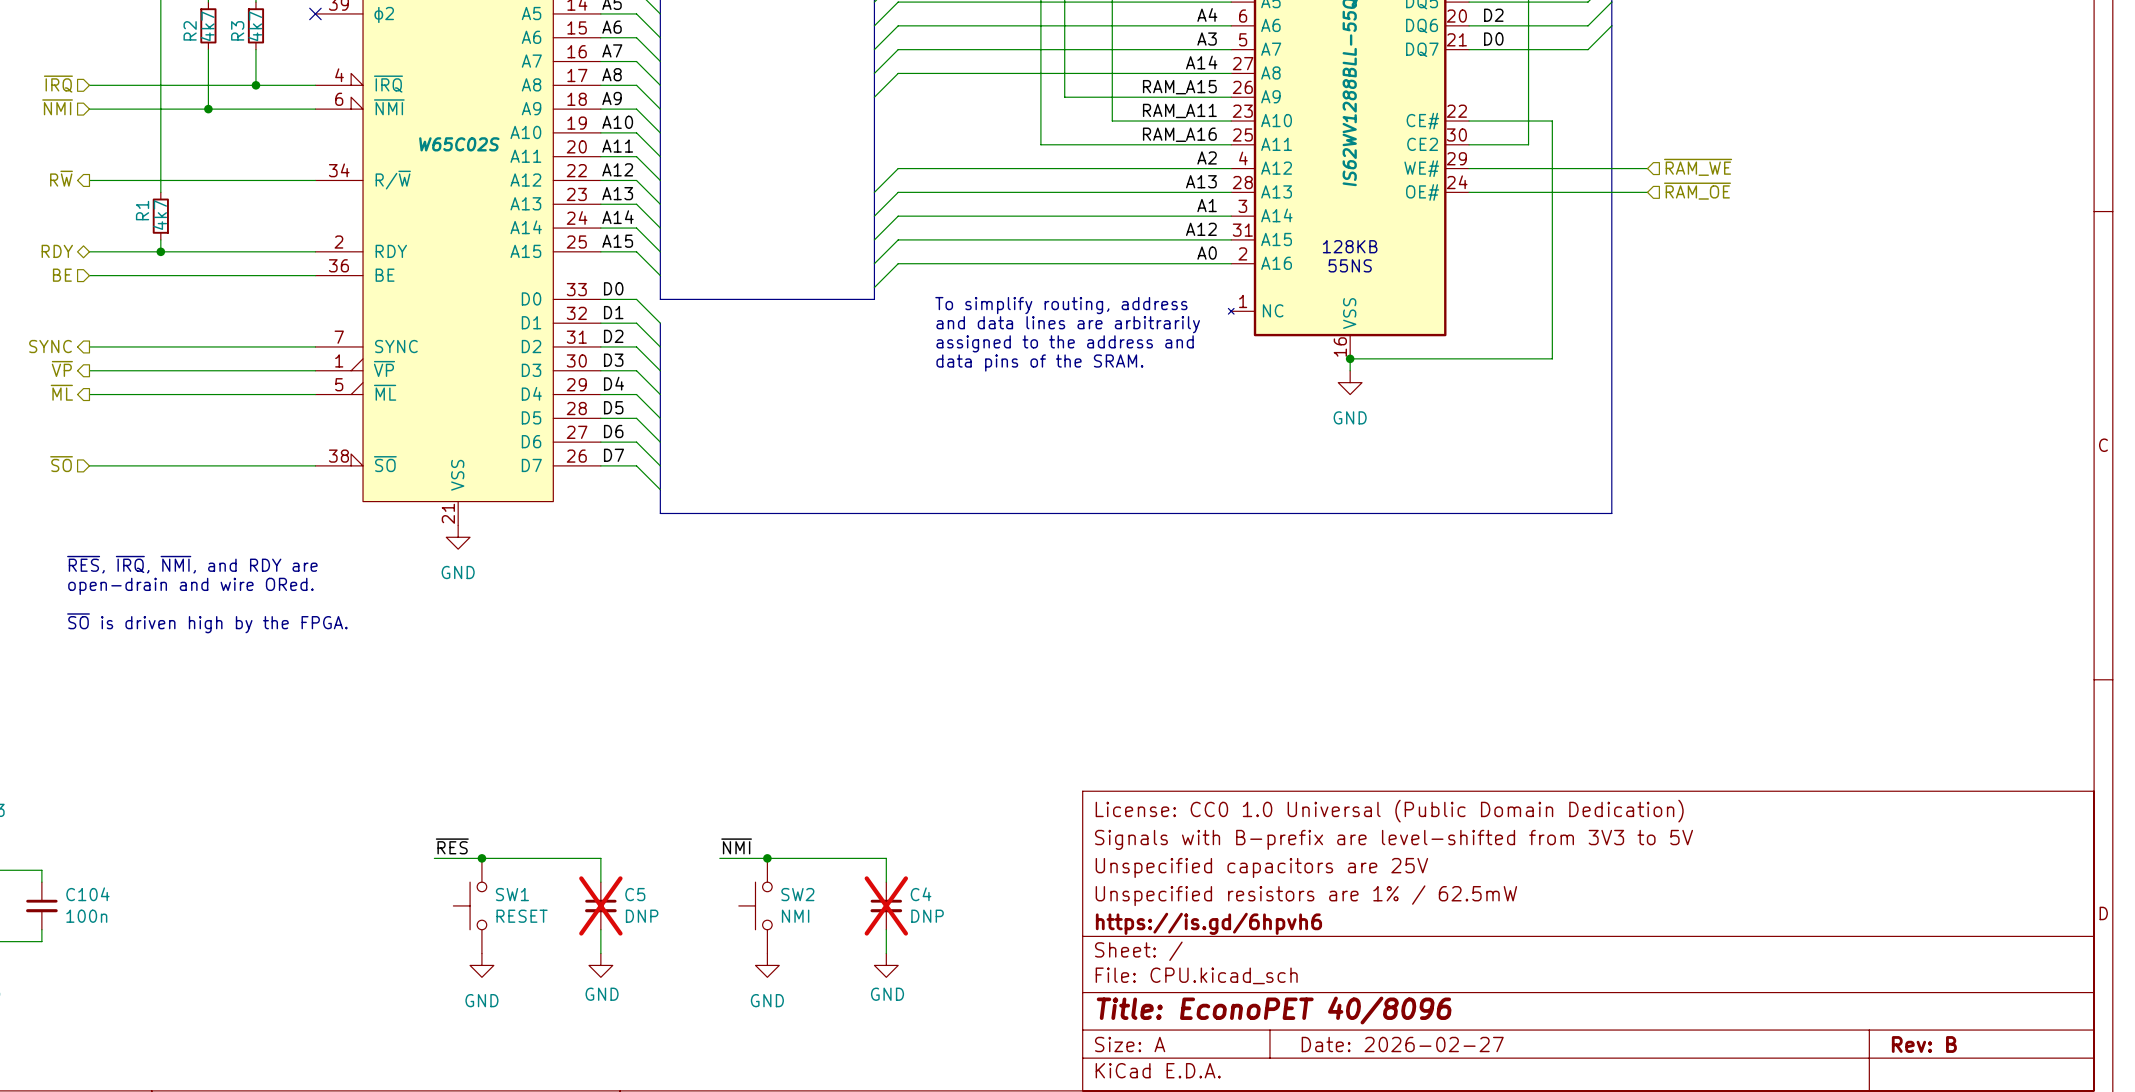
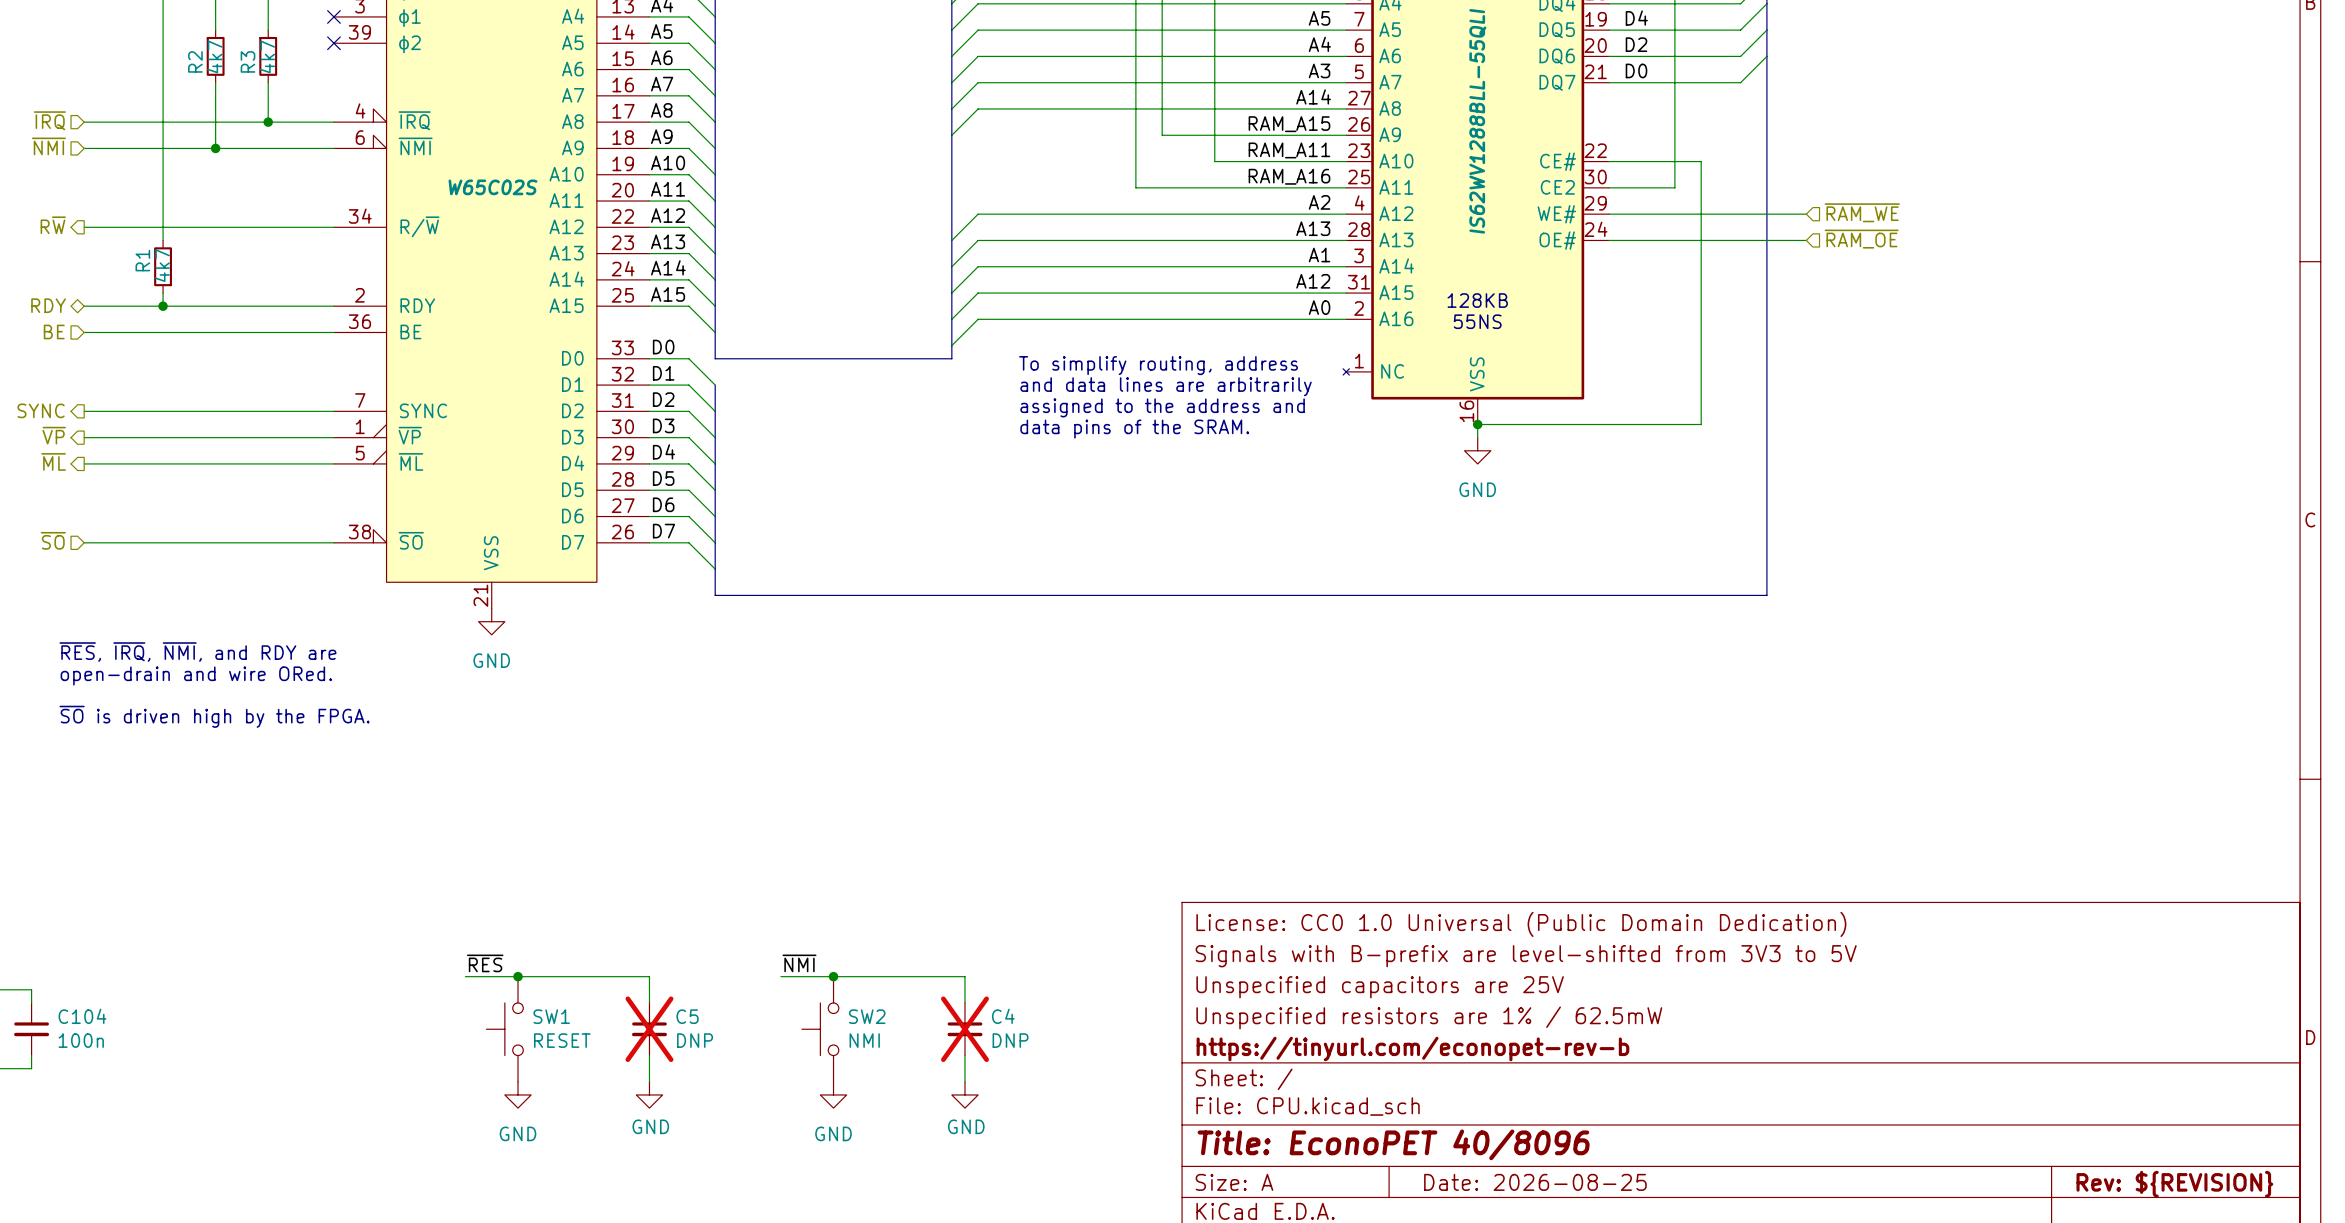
title block: https://is.gd/6hpvh6 (1208, 923) -> https://tinyurl.com/econopet-rev-b (1412, 1049)
title block: Date: 2026-02-27 (1402, 1044) -> Date: 2026-08-25 (1535, 1182)
title block: Rev: B (1924, 1044) -> Rev: ${REVISION} (2174, 1184)

